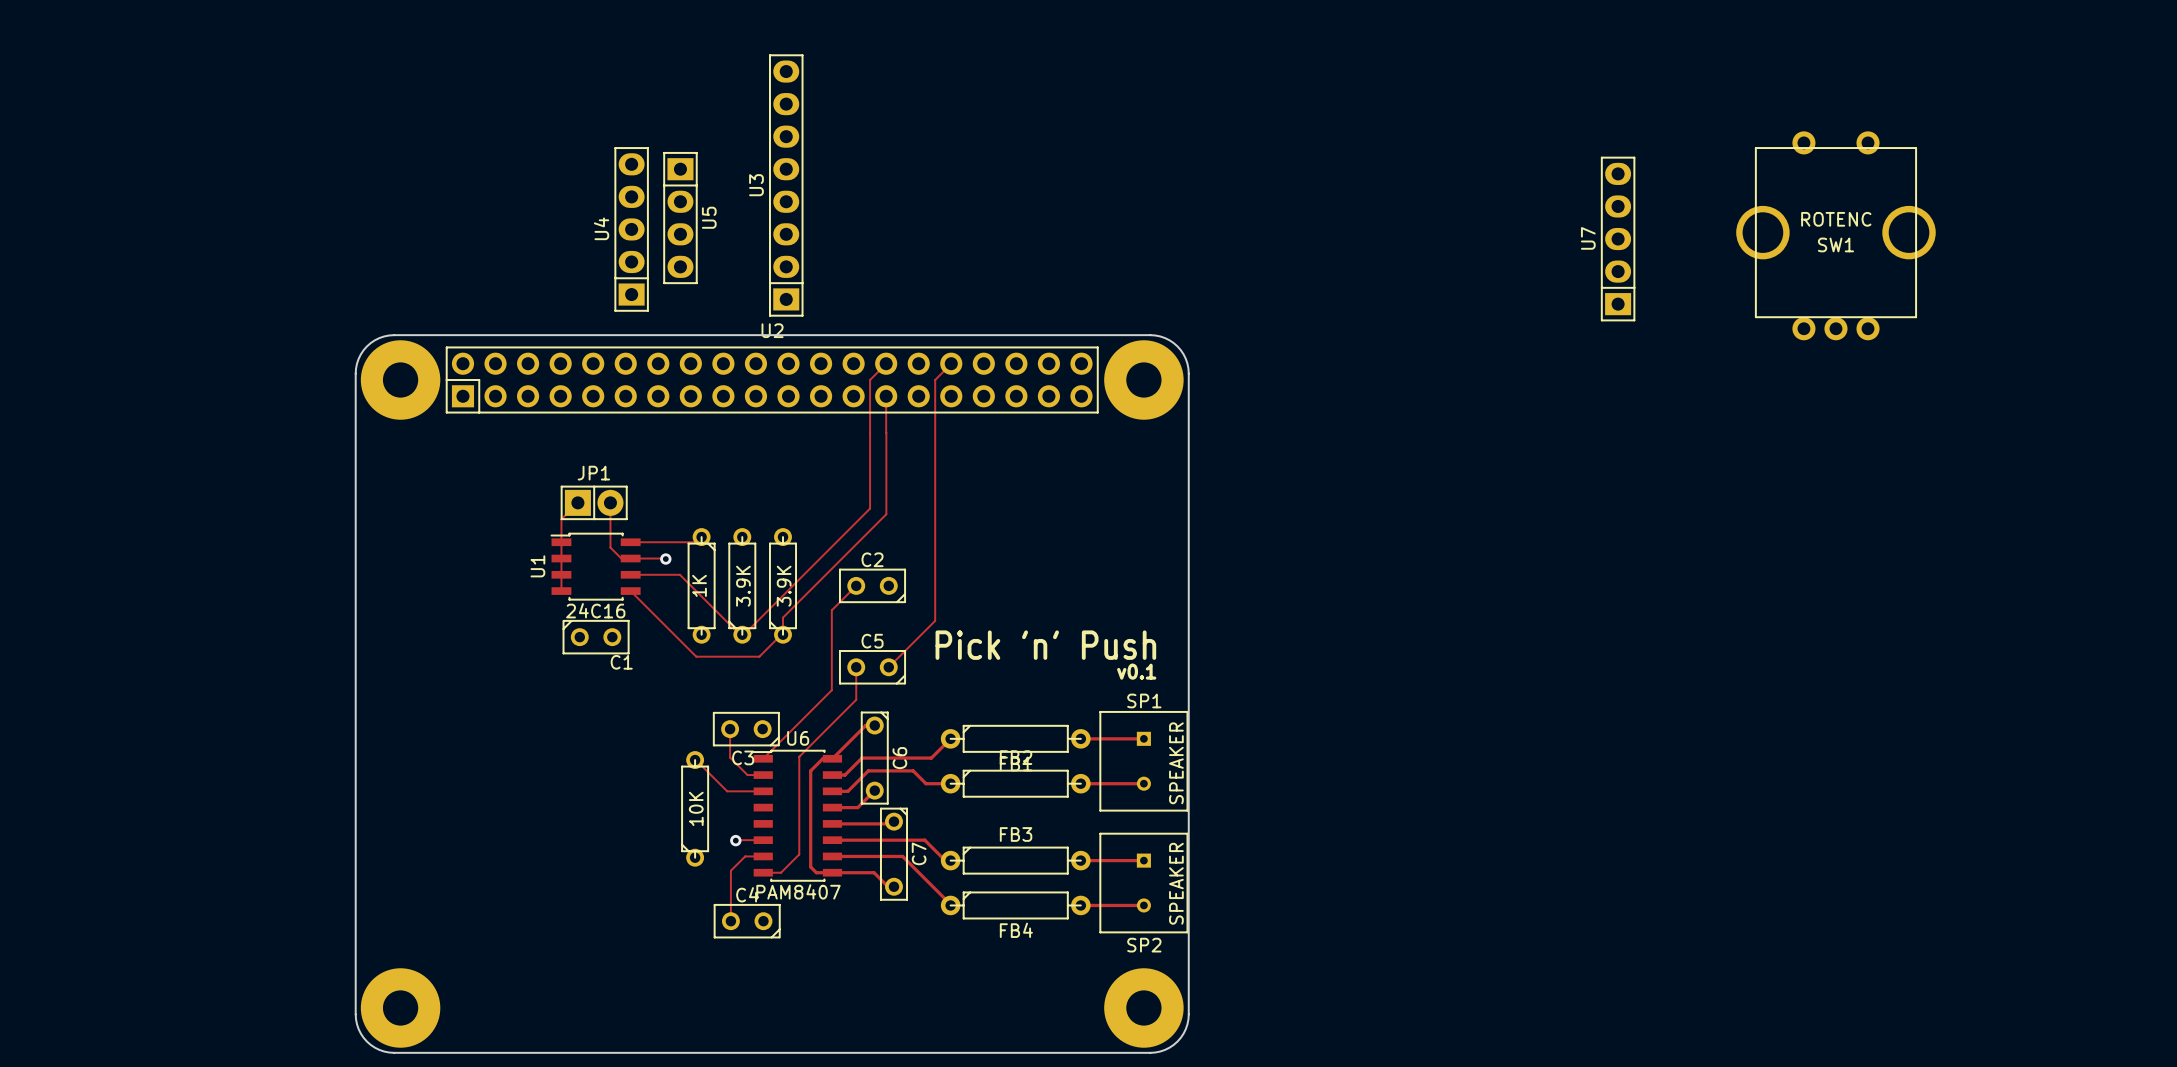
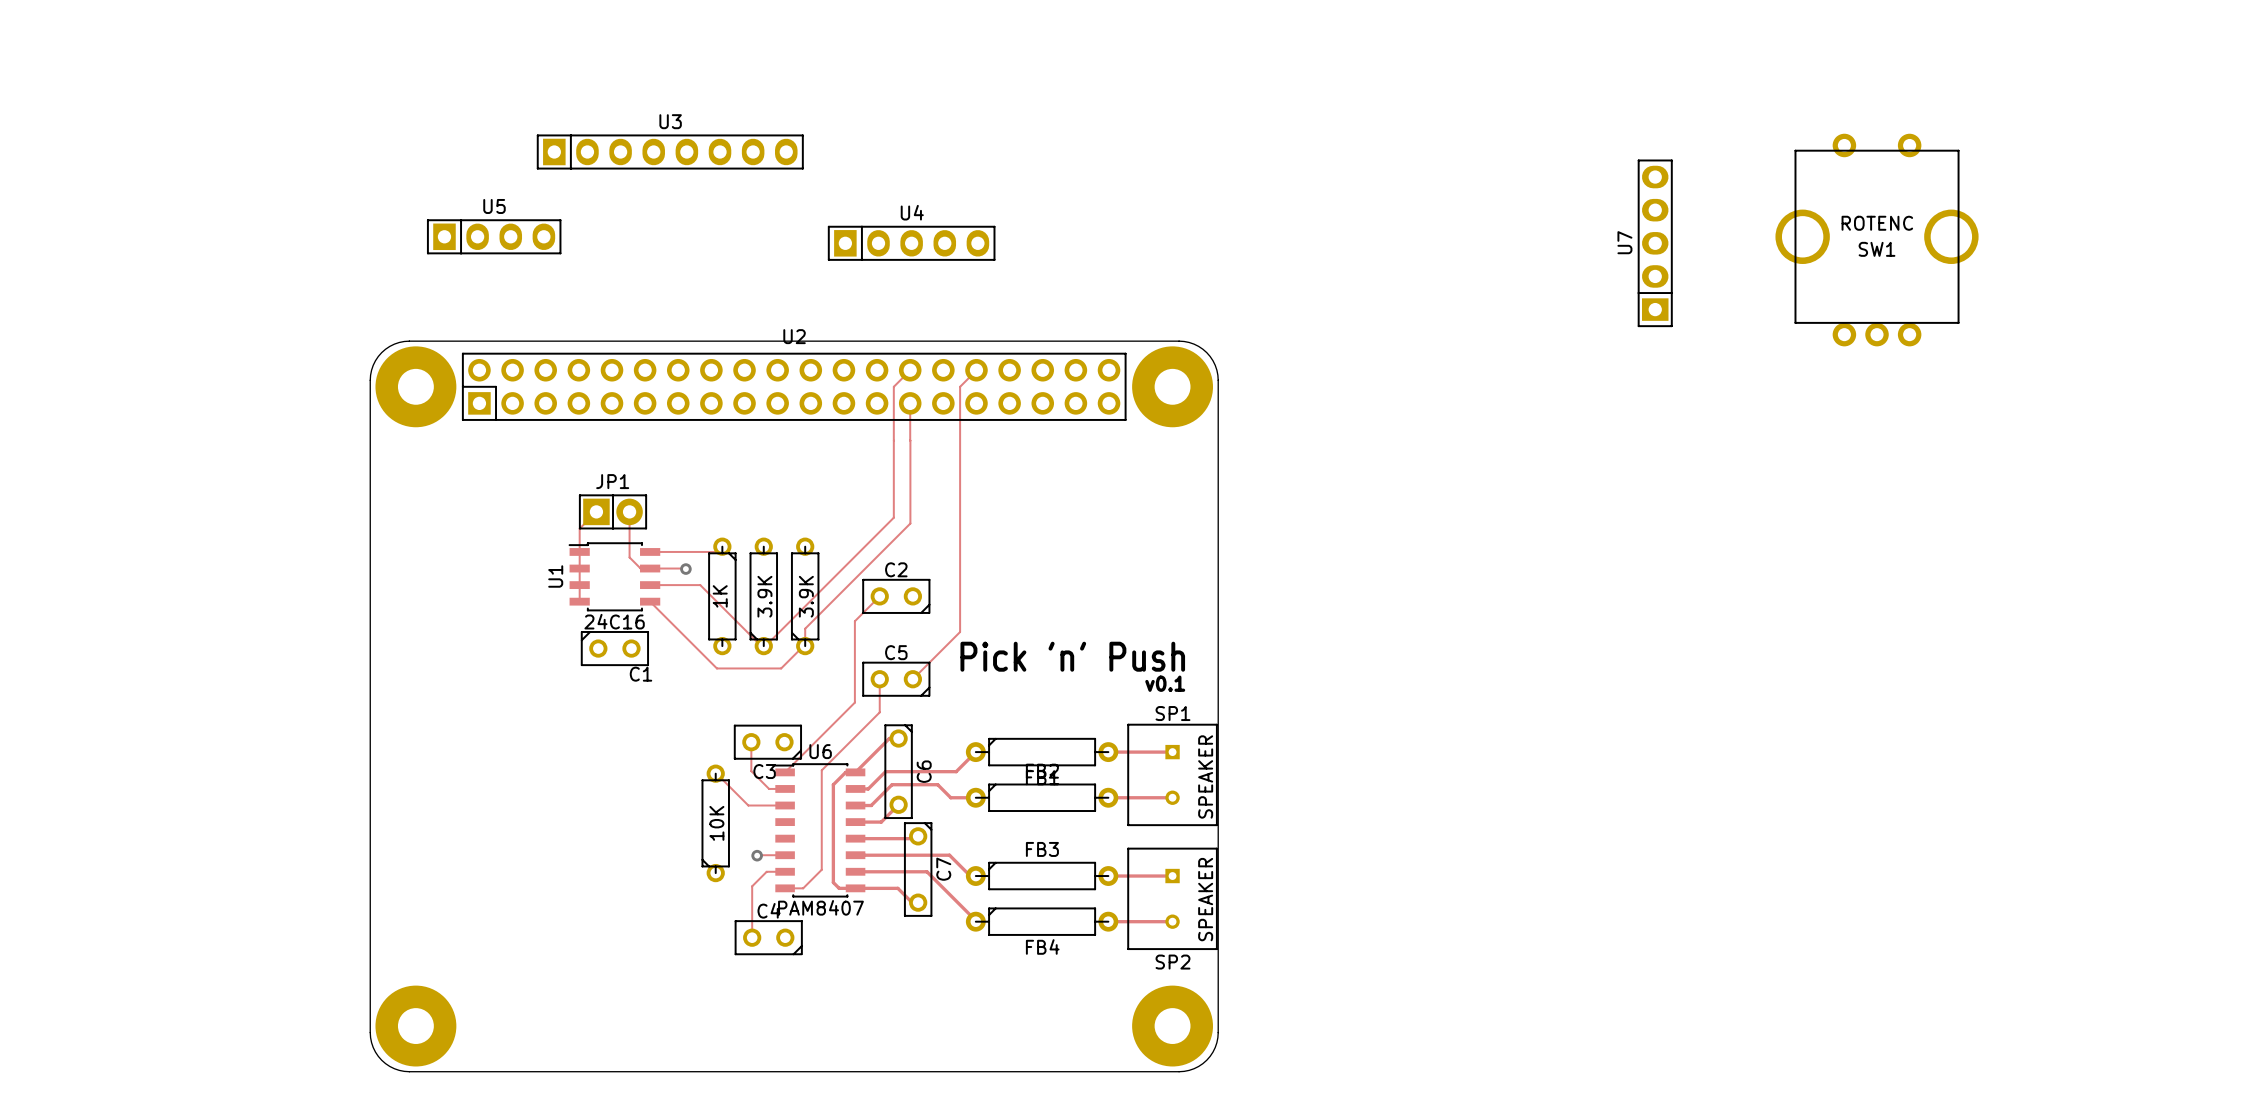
U3 rotation: 0° (786, 185) -> 90° clockwise (670, 151)
U5 rotation: 0° (680, 218) -> 90° counterclockwise (494, 236)
U5 position: (680, 218) -> (494, 236)
U4 rotation: 0° (631, 229) -> 90° clockwise (911, 243)
U4 position: (631, 229) -> (911, 243)

